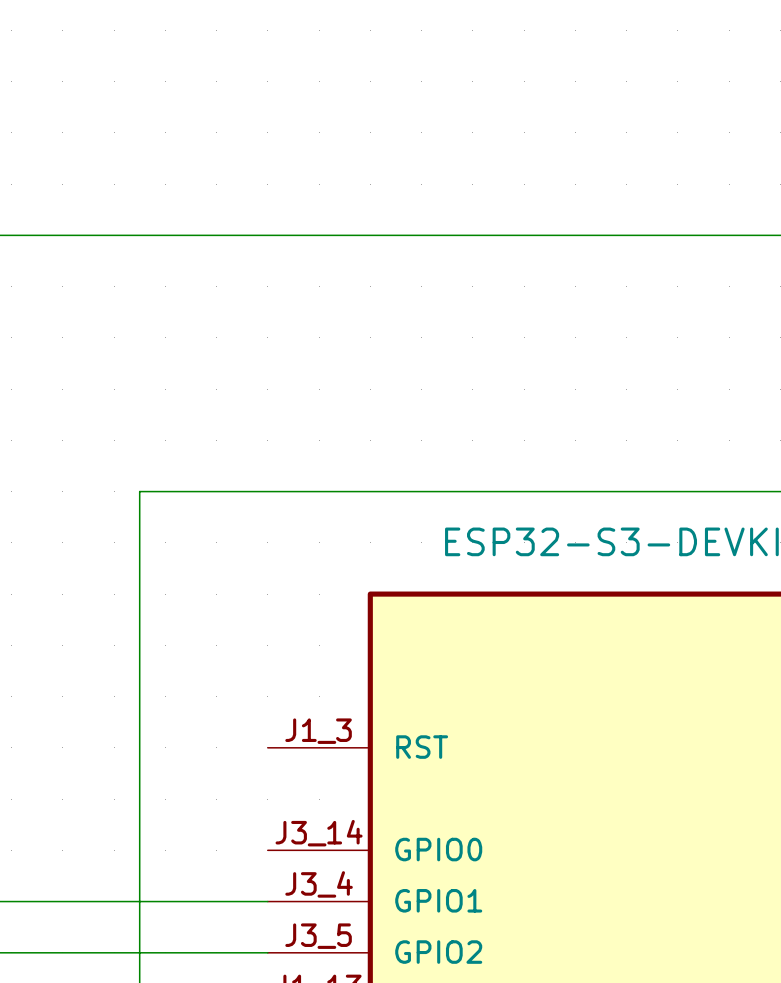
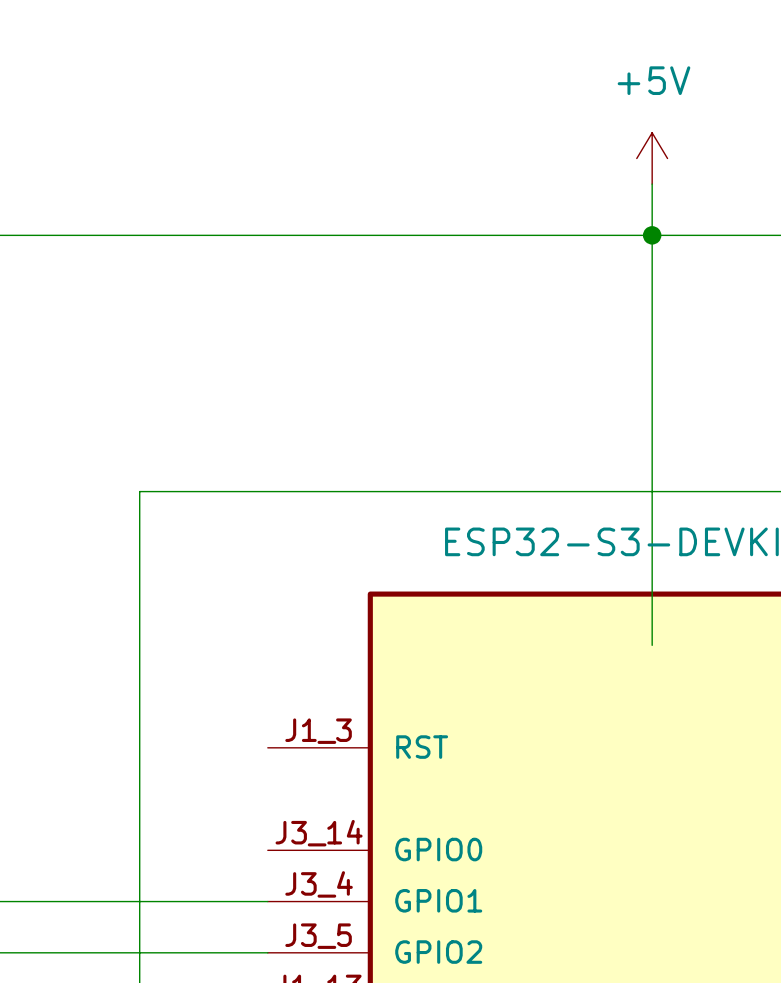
power symbol: none -> +5V (652, 158)
wire: none -> (652, 184) (652, 645)
junction: none -> (652, 235)

